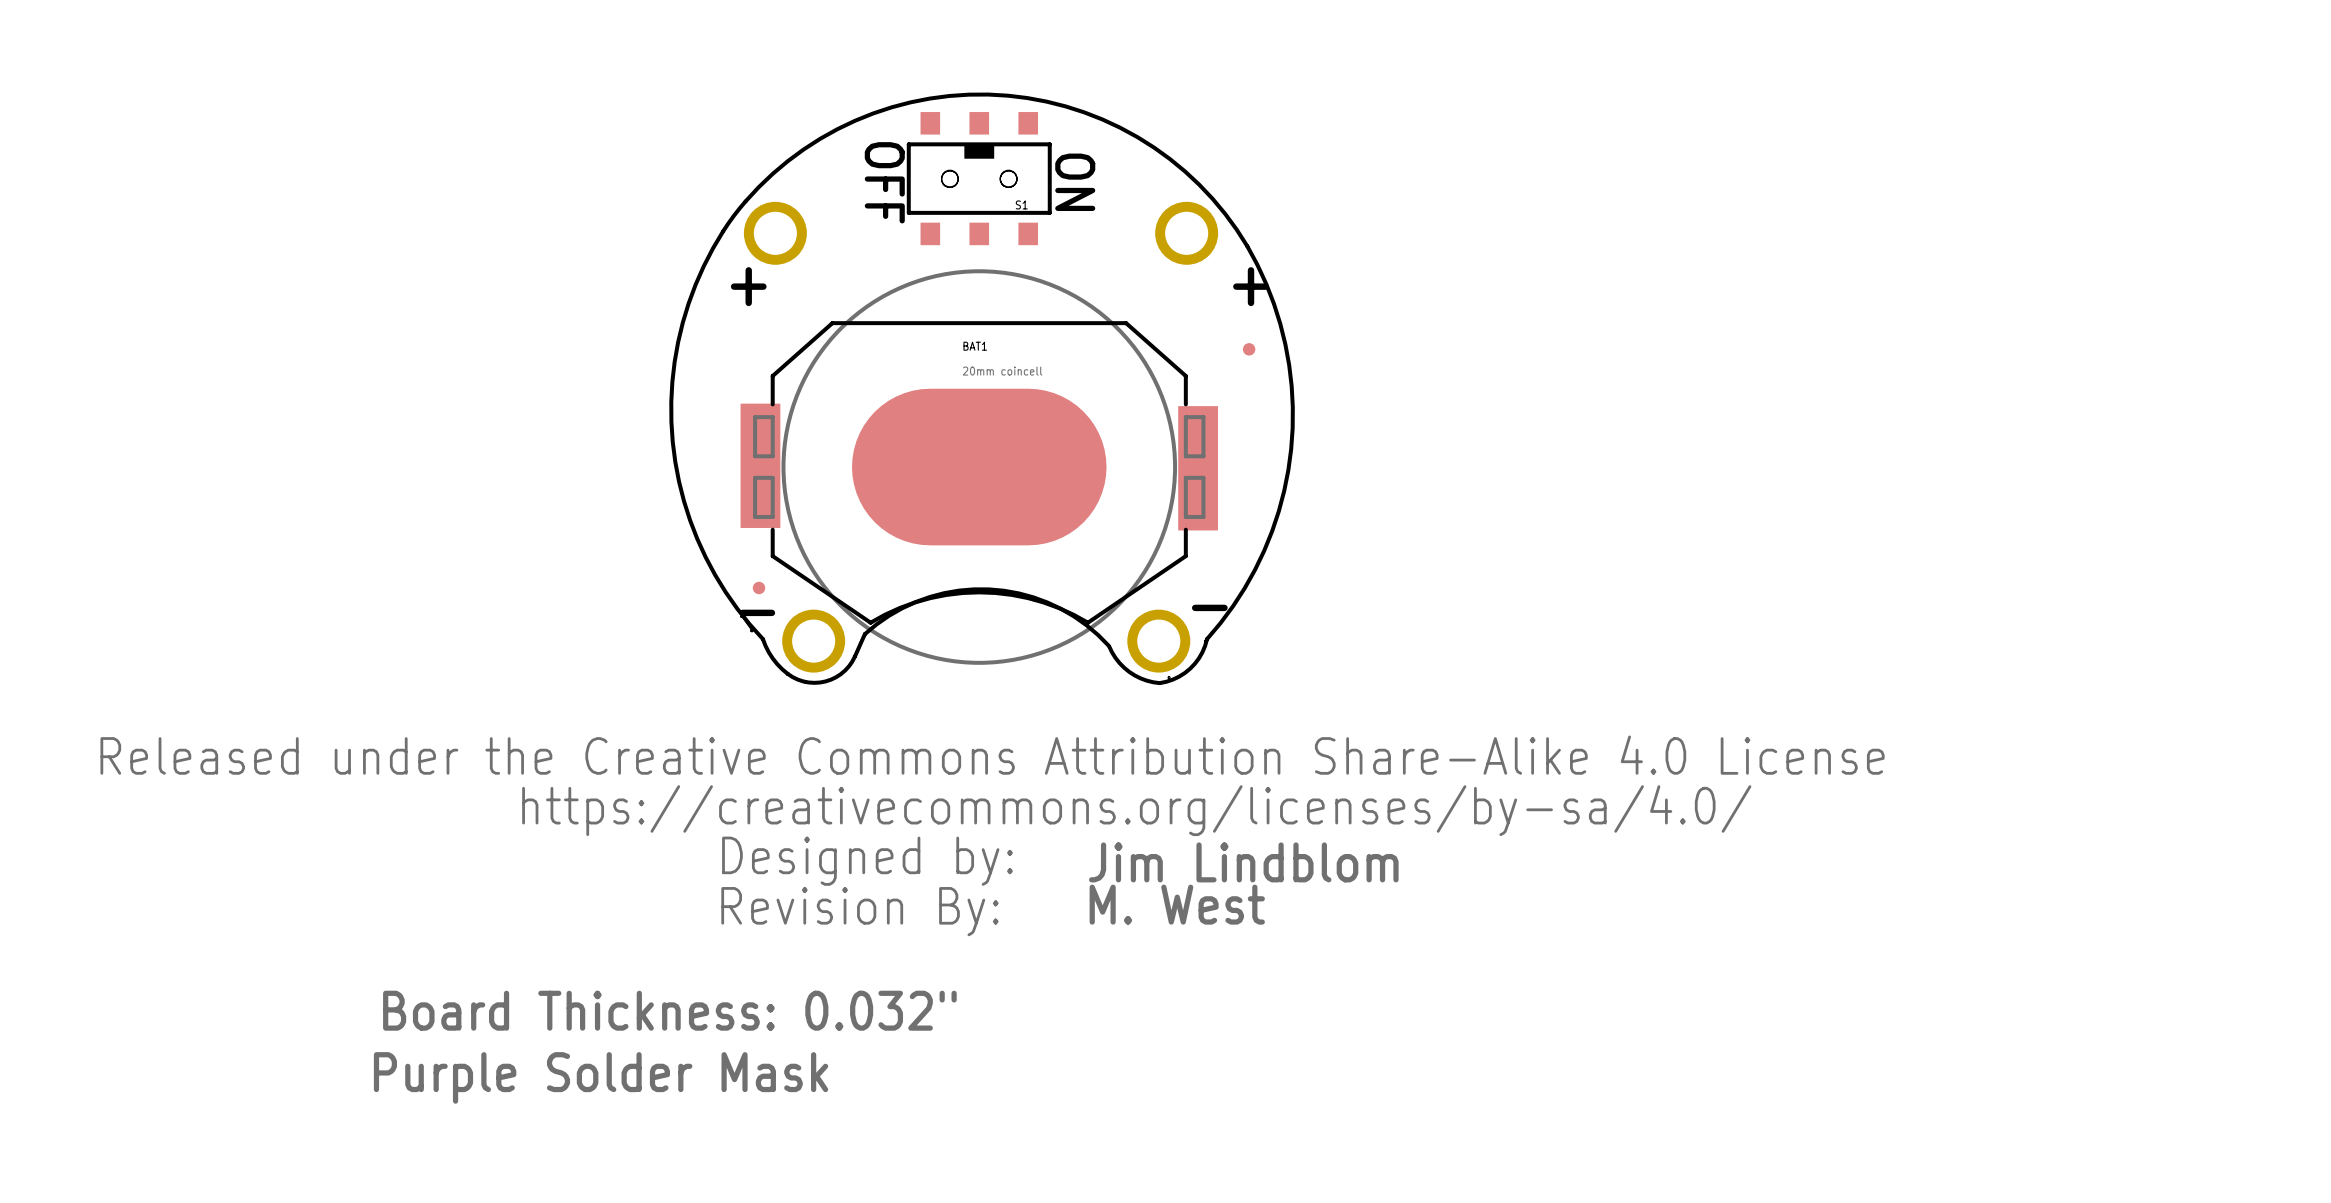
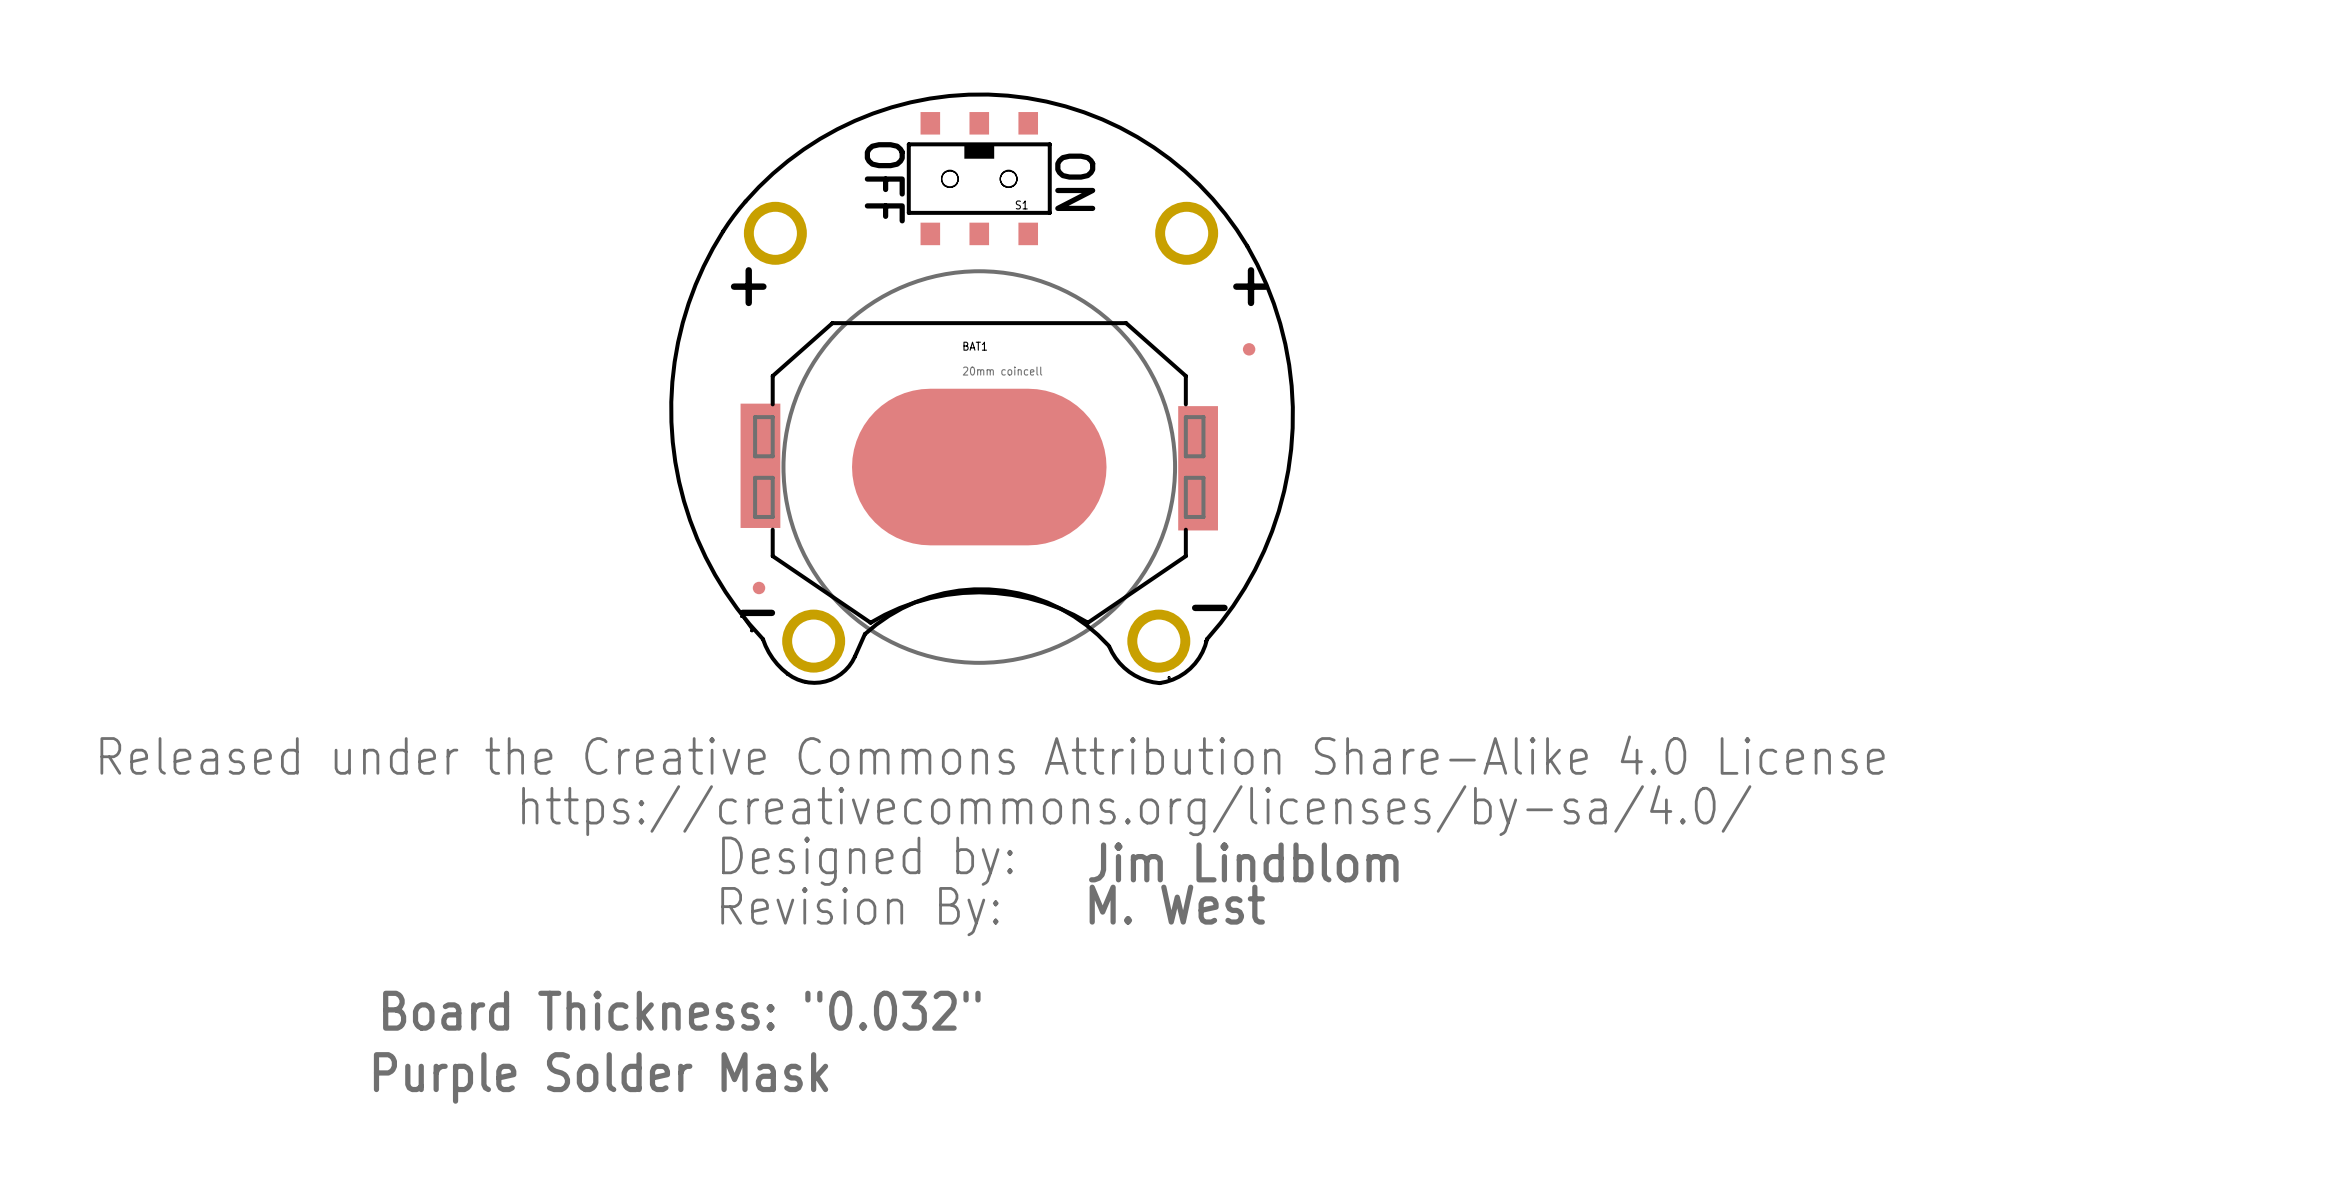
text: Board Thickness: 0.032" (669, 1010) -> Board Thickness: "0.032" (681, 1010)

